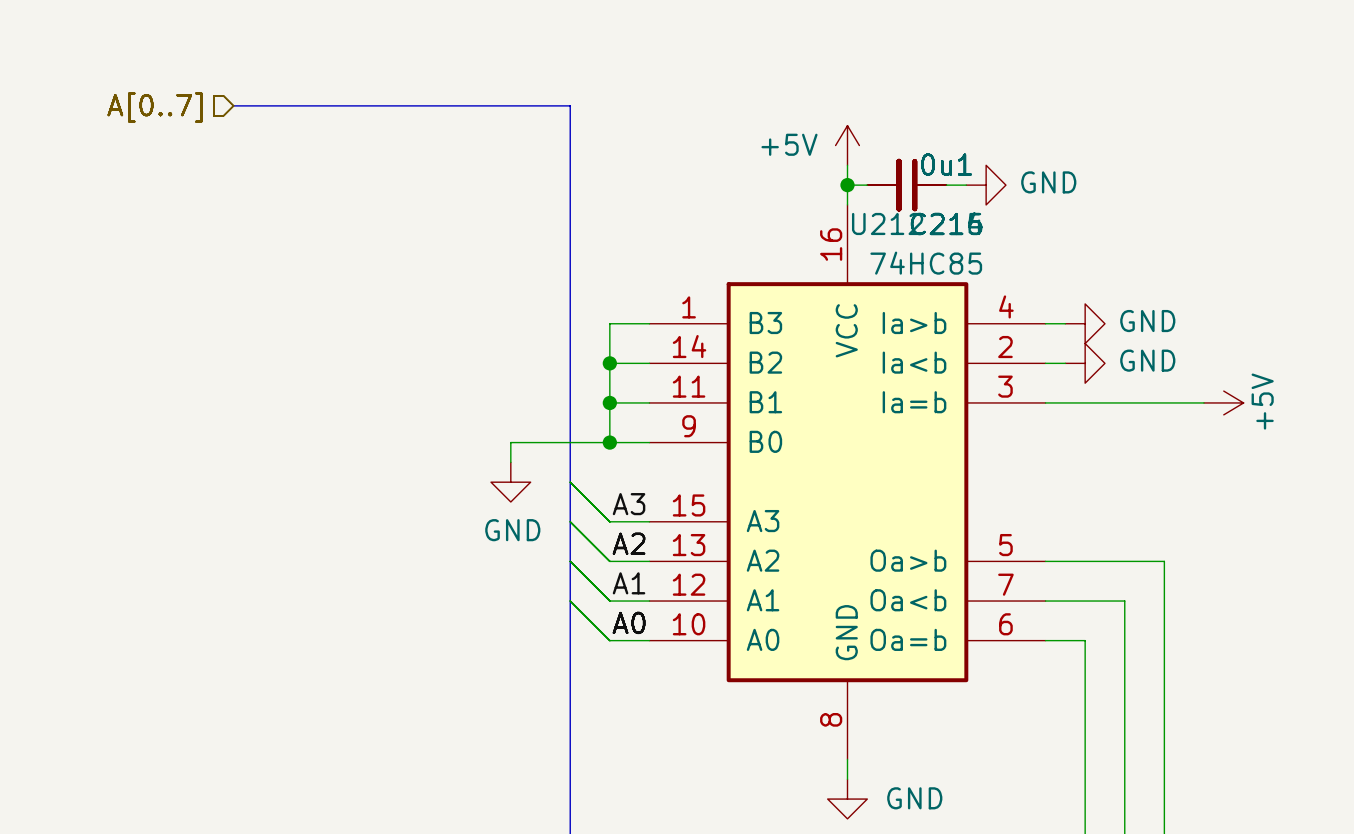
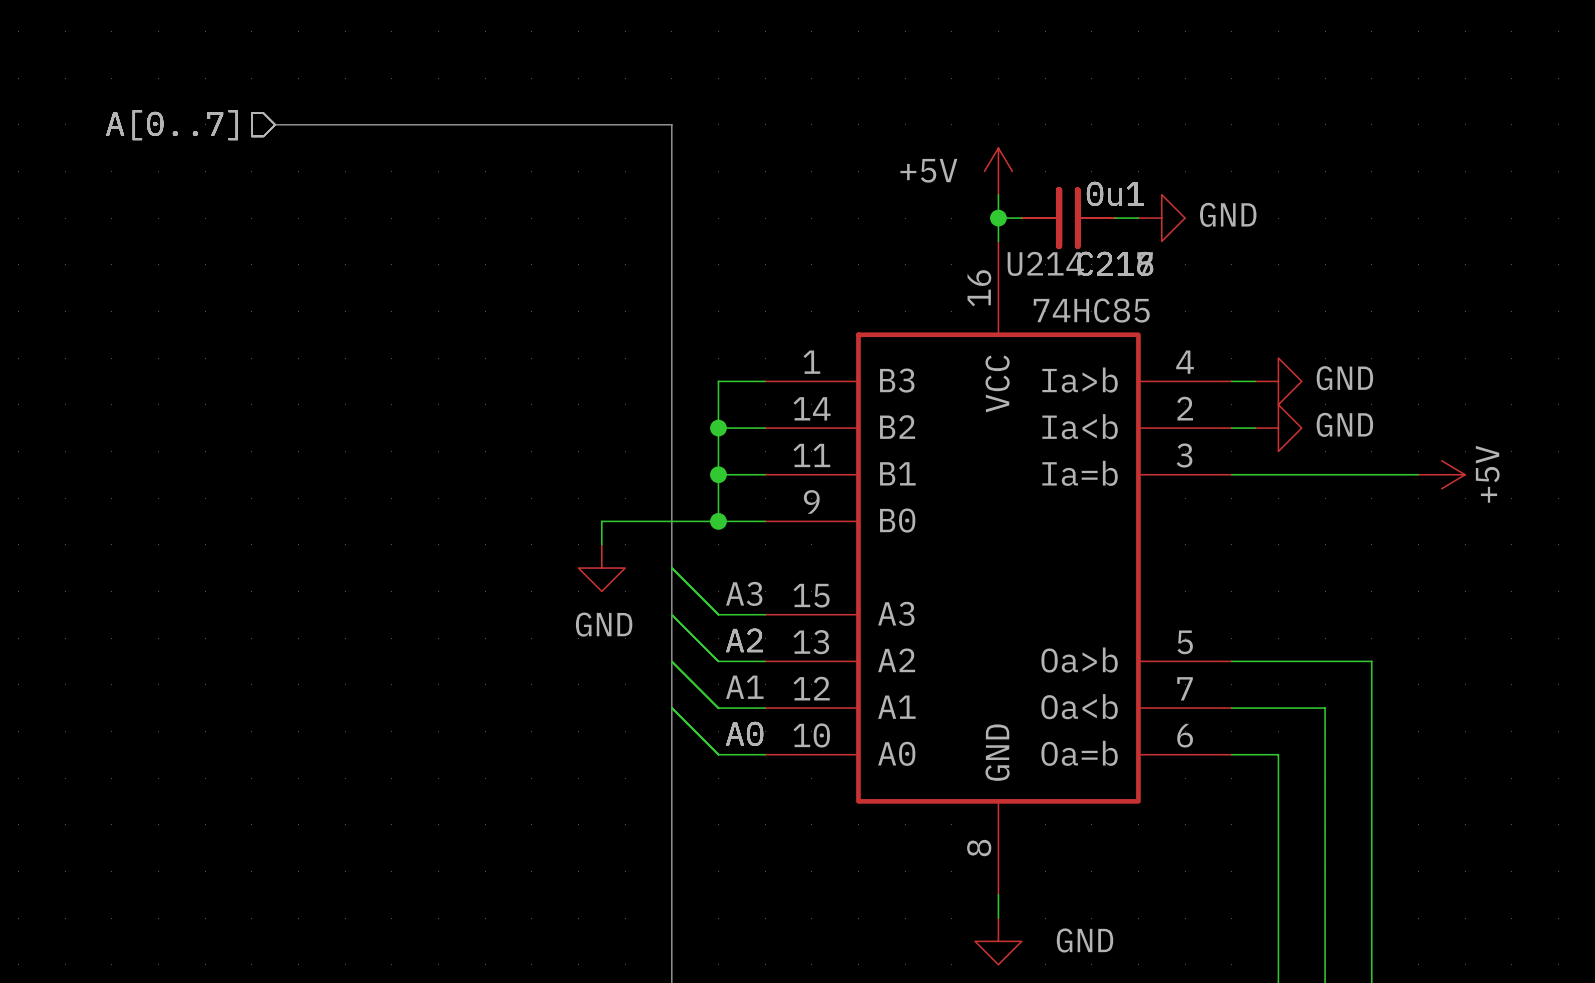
part: 0u1 (906, 185) -> none
part: 0u1 (906, 185) -> none
part: none -> 0u1 (1068, 218)
part: none -> 0u1 (1068, 218)
U212 name: U212 (887, 223) -> U214 (1045, 263)

